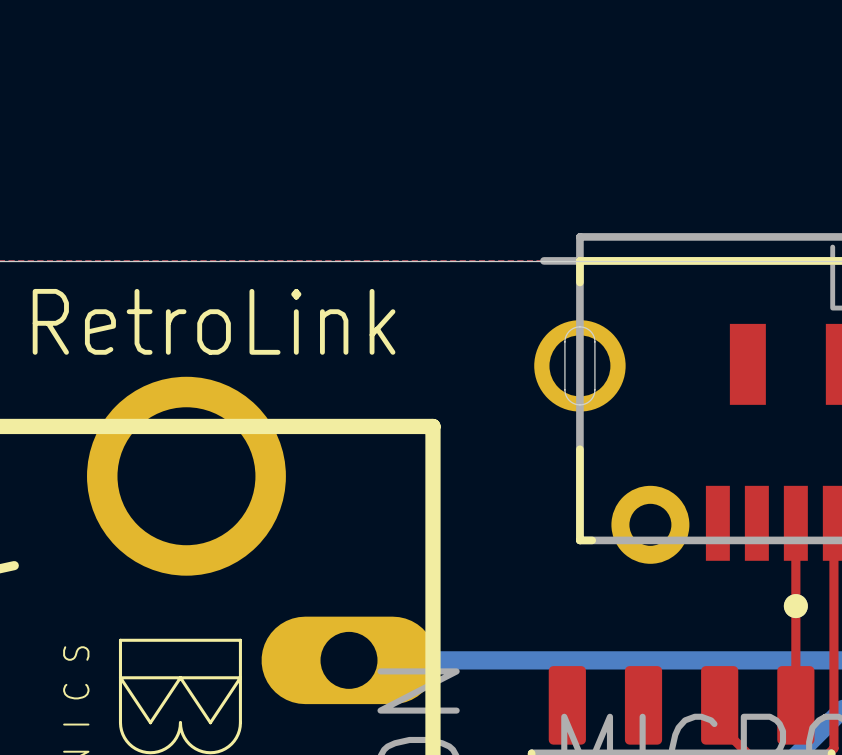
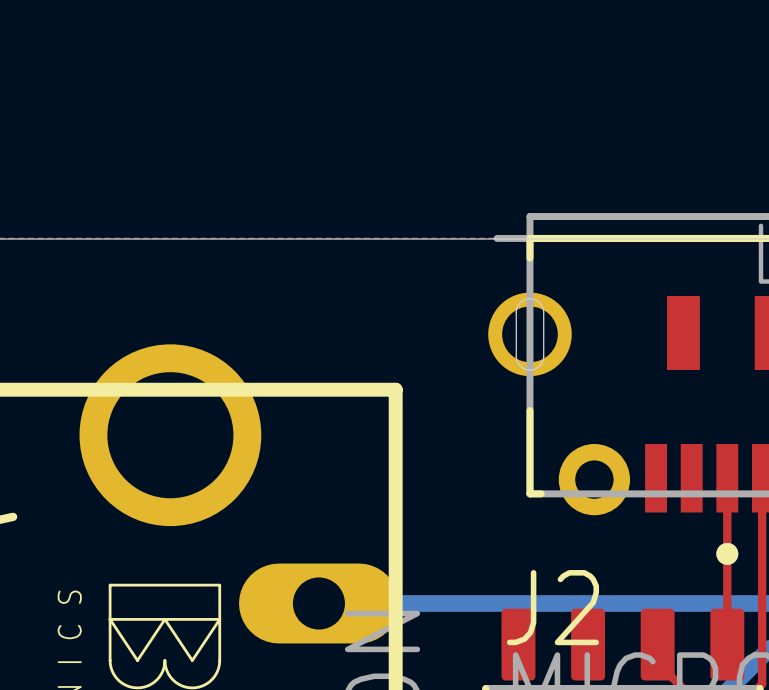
text: RetroLink (214, 321) -> none
J2 name: none -> J2 (552, 607)

